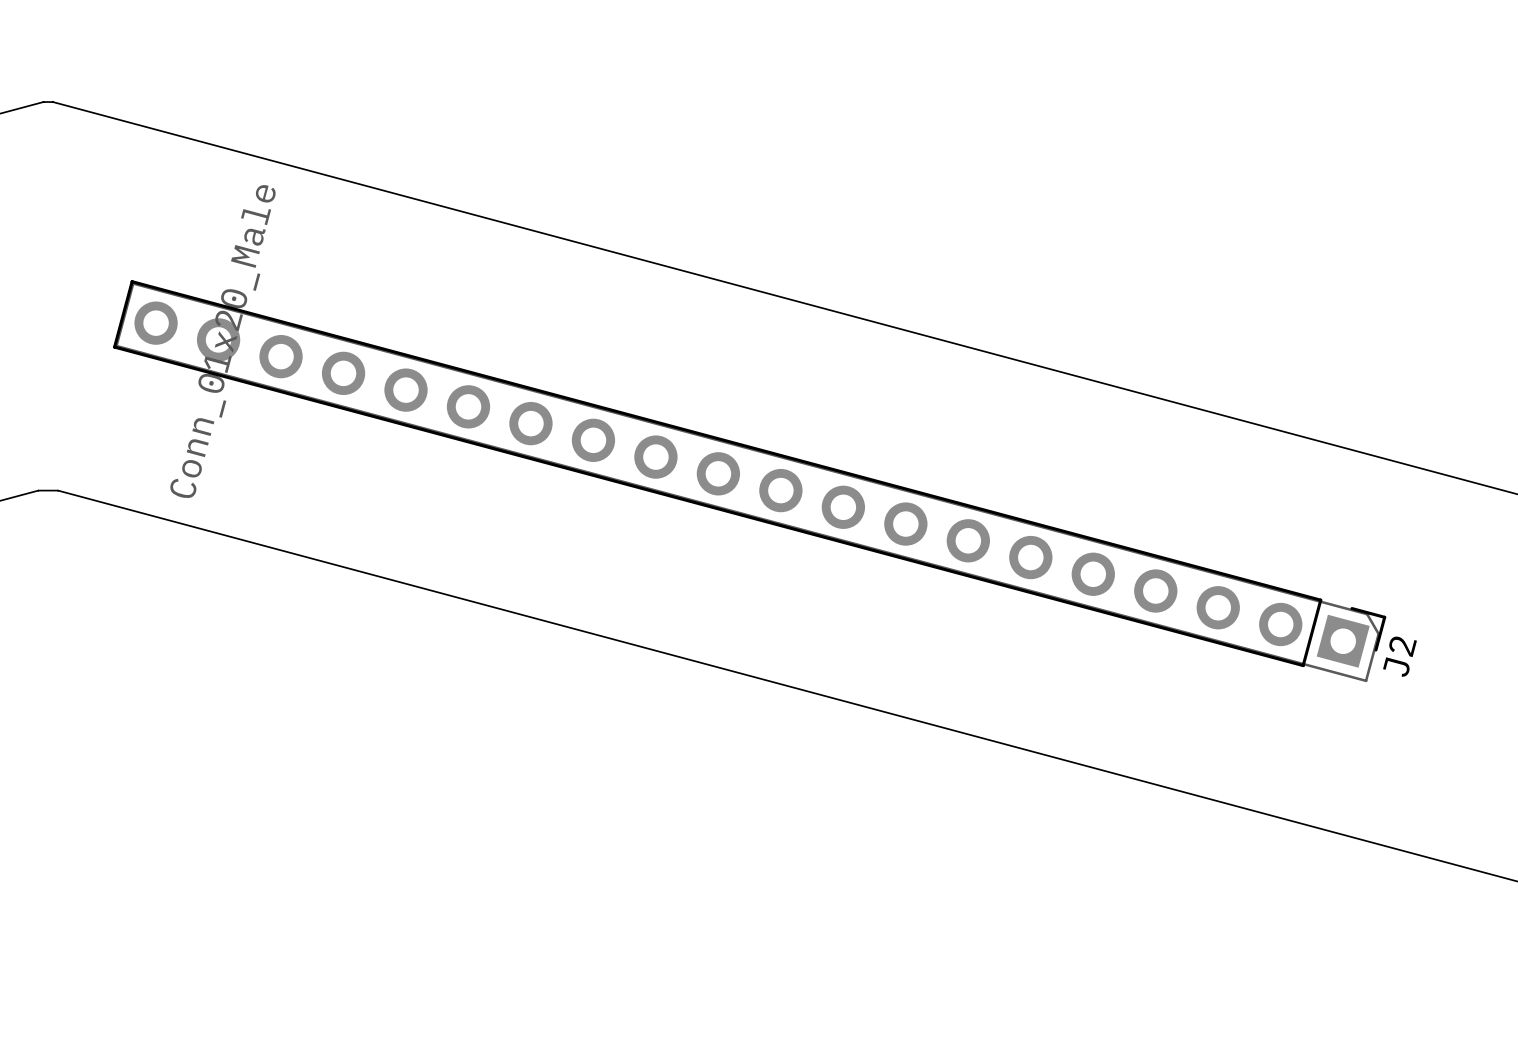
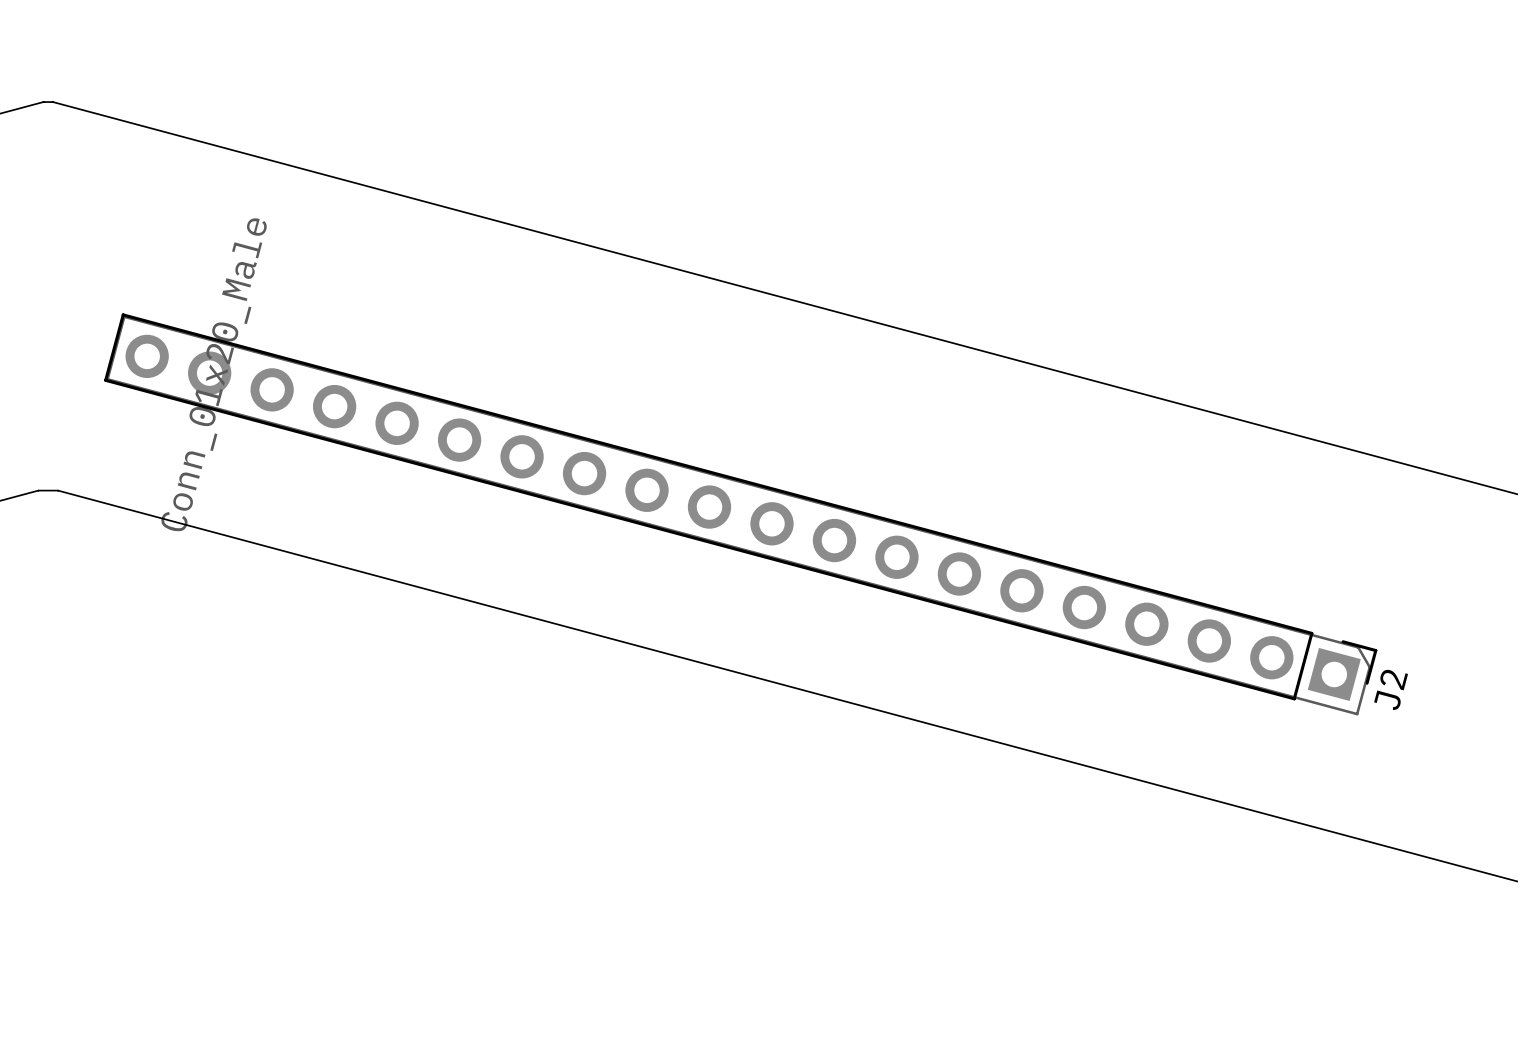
J2 position: (749, 481) -> (740, 514)

